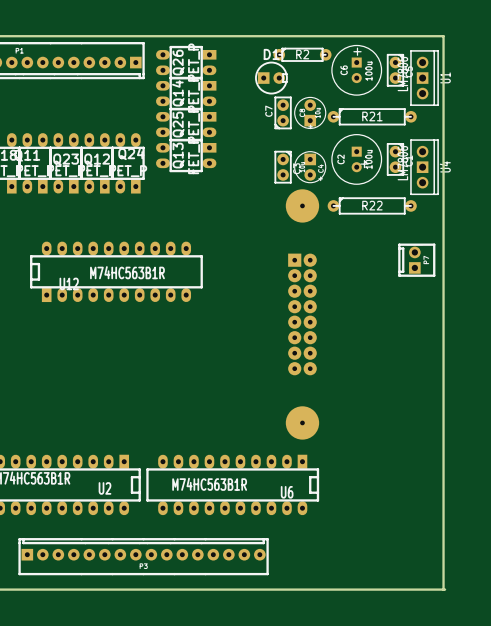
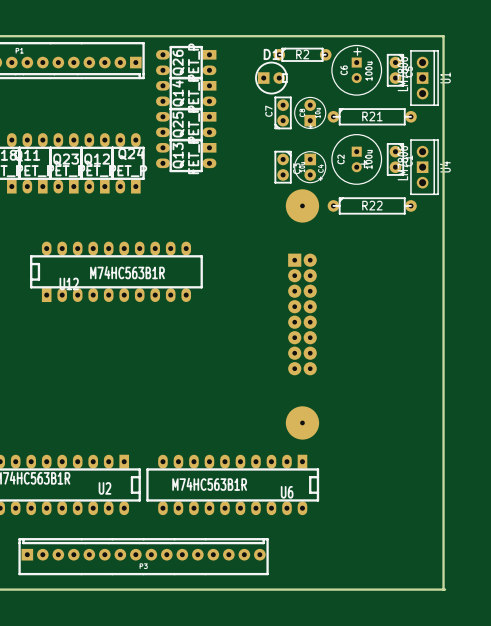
part: (416, 260) -> none

